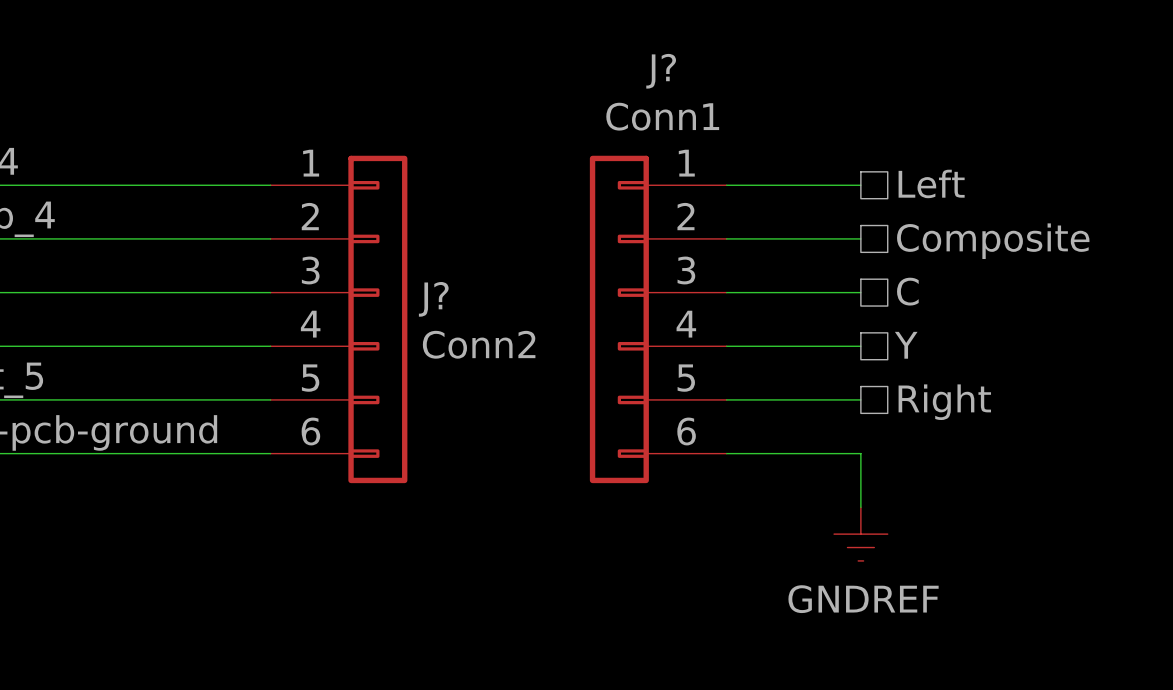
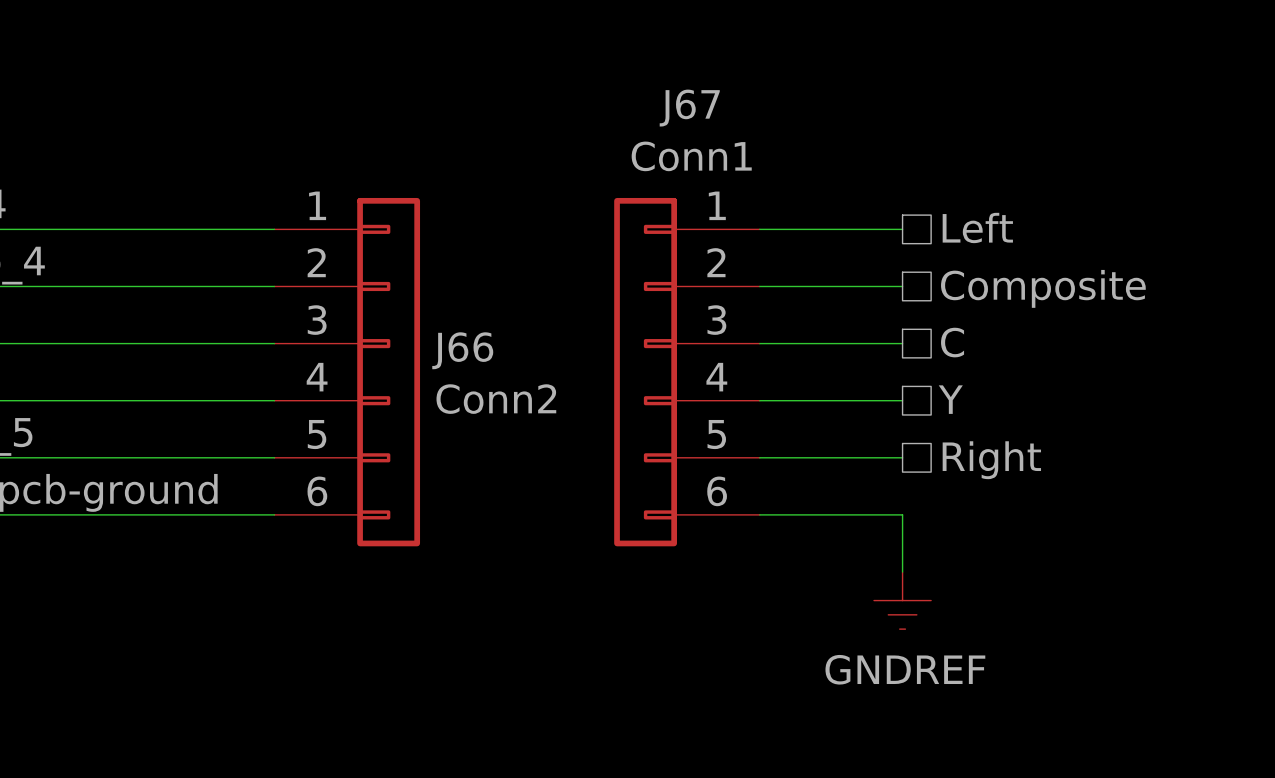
J? name: J? (661, 71) -> J67 (689, 108)
J? name: J? (433, 299) -> J66 (462, 350)

